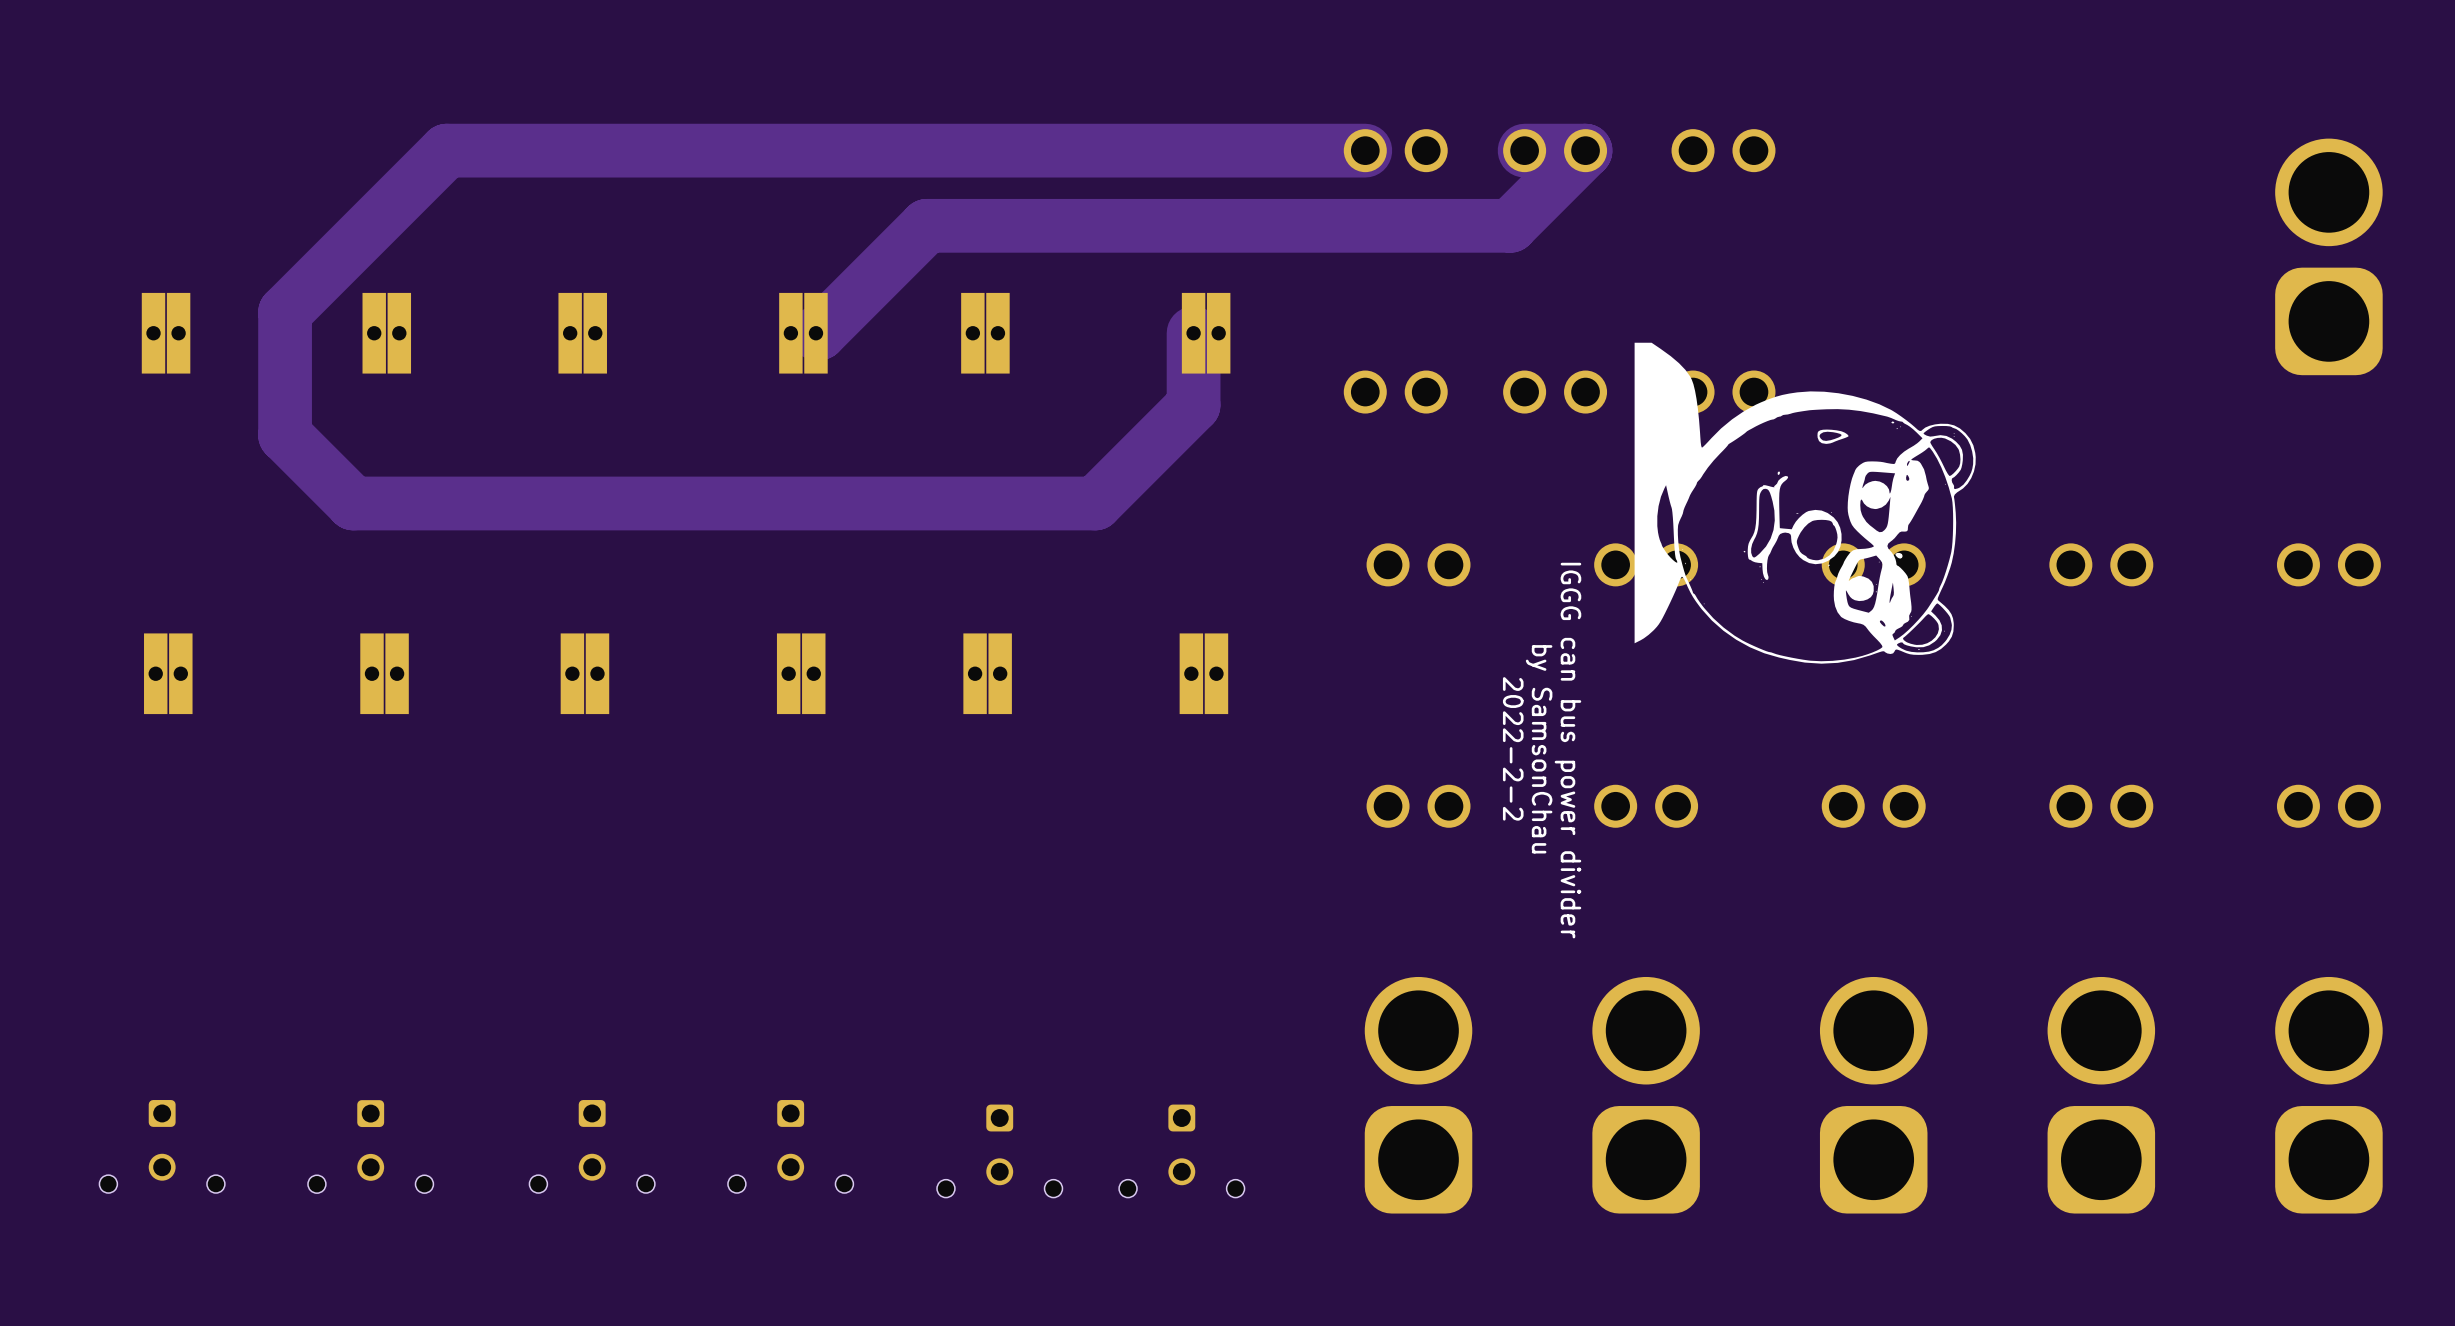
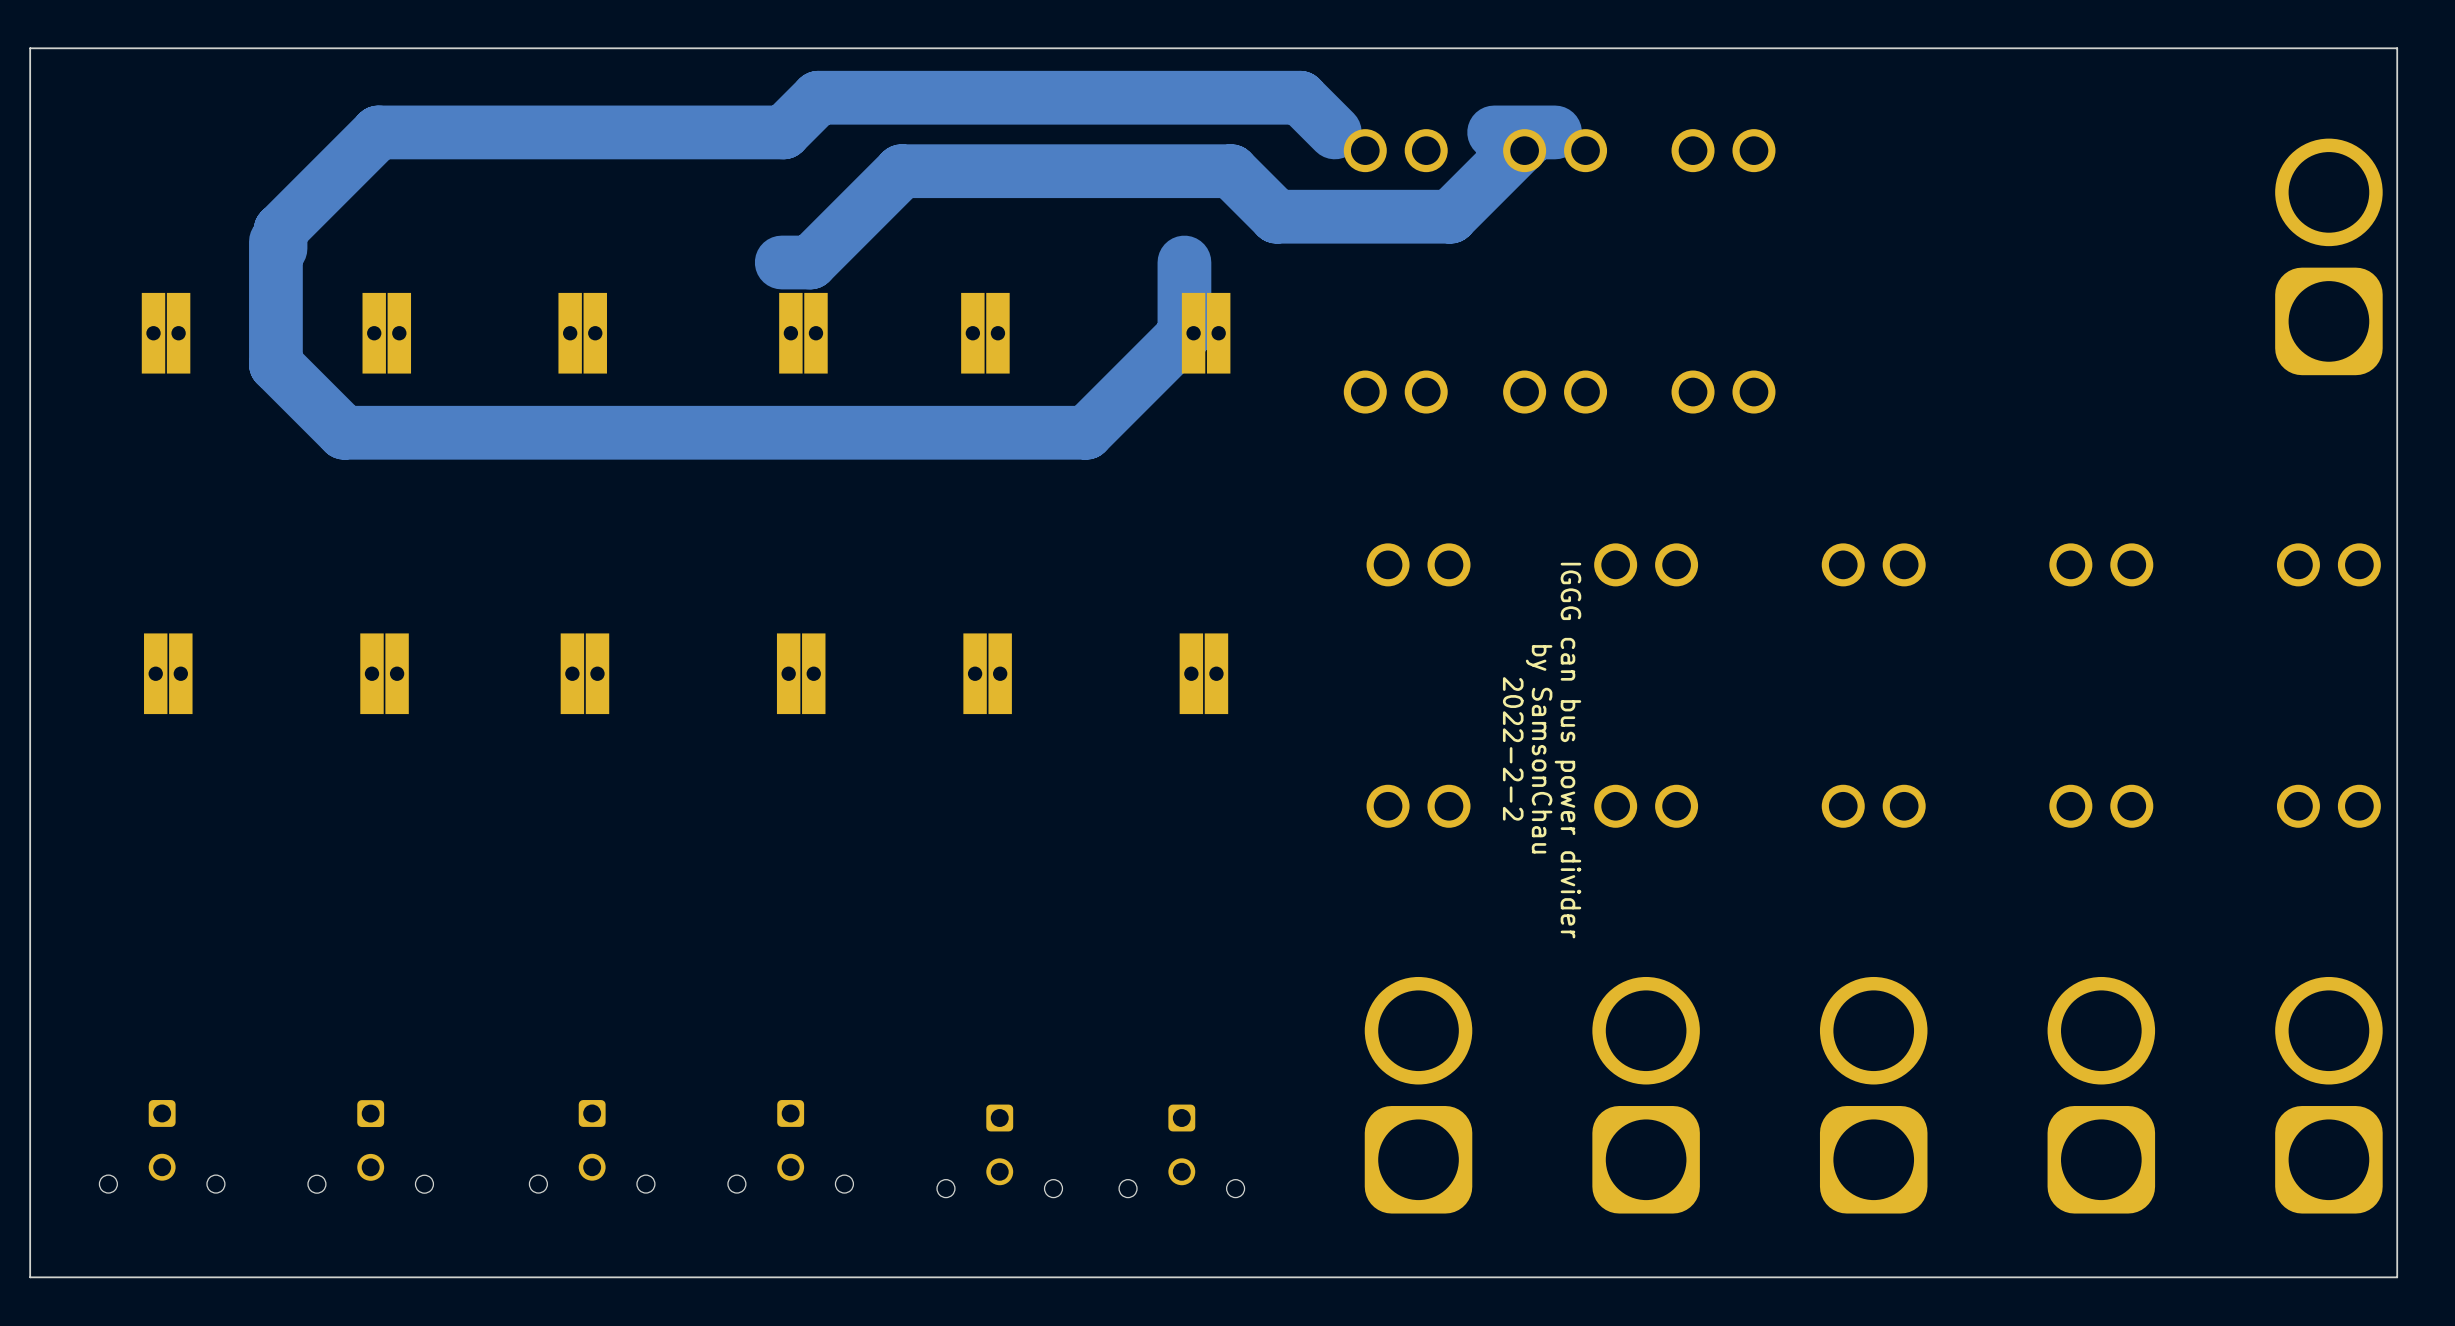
board edge: none -> (2397, 48) (2397, 1277) (30, 1277) (30, 48) (2397, 48)
track: none -> (1334, 132) (1300, 97) (818, 97) (783, 132) (378, 132) (280, 230) (280, 248)
track: none -> (1555, 132) (1494, 132)
track: none -> (1527, 139) (1450, 216) (1276, 216) (1231, 171) (901, 171) (810, 262) (781, 262)
track: (1365, 150) (446, 150) (285, 312) (285, 435) (353, 503) (1095, 503) (1193, 405) (1193, 333) -> none
track: (1524, 150) (1585, 150) (1510, 225) (926, 225) (819, 333) (815, 333) -> none
track: none -> (275, 241) (275, 364) (344, 432) (1086, 432) (1184, 334) (1184, 262)
drawing: [1634, 342, 1976, 664] -> none

